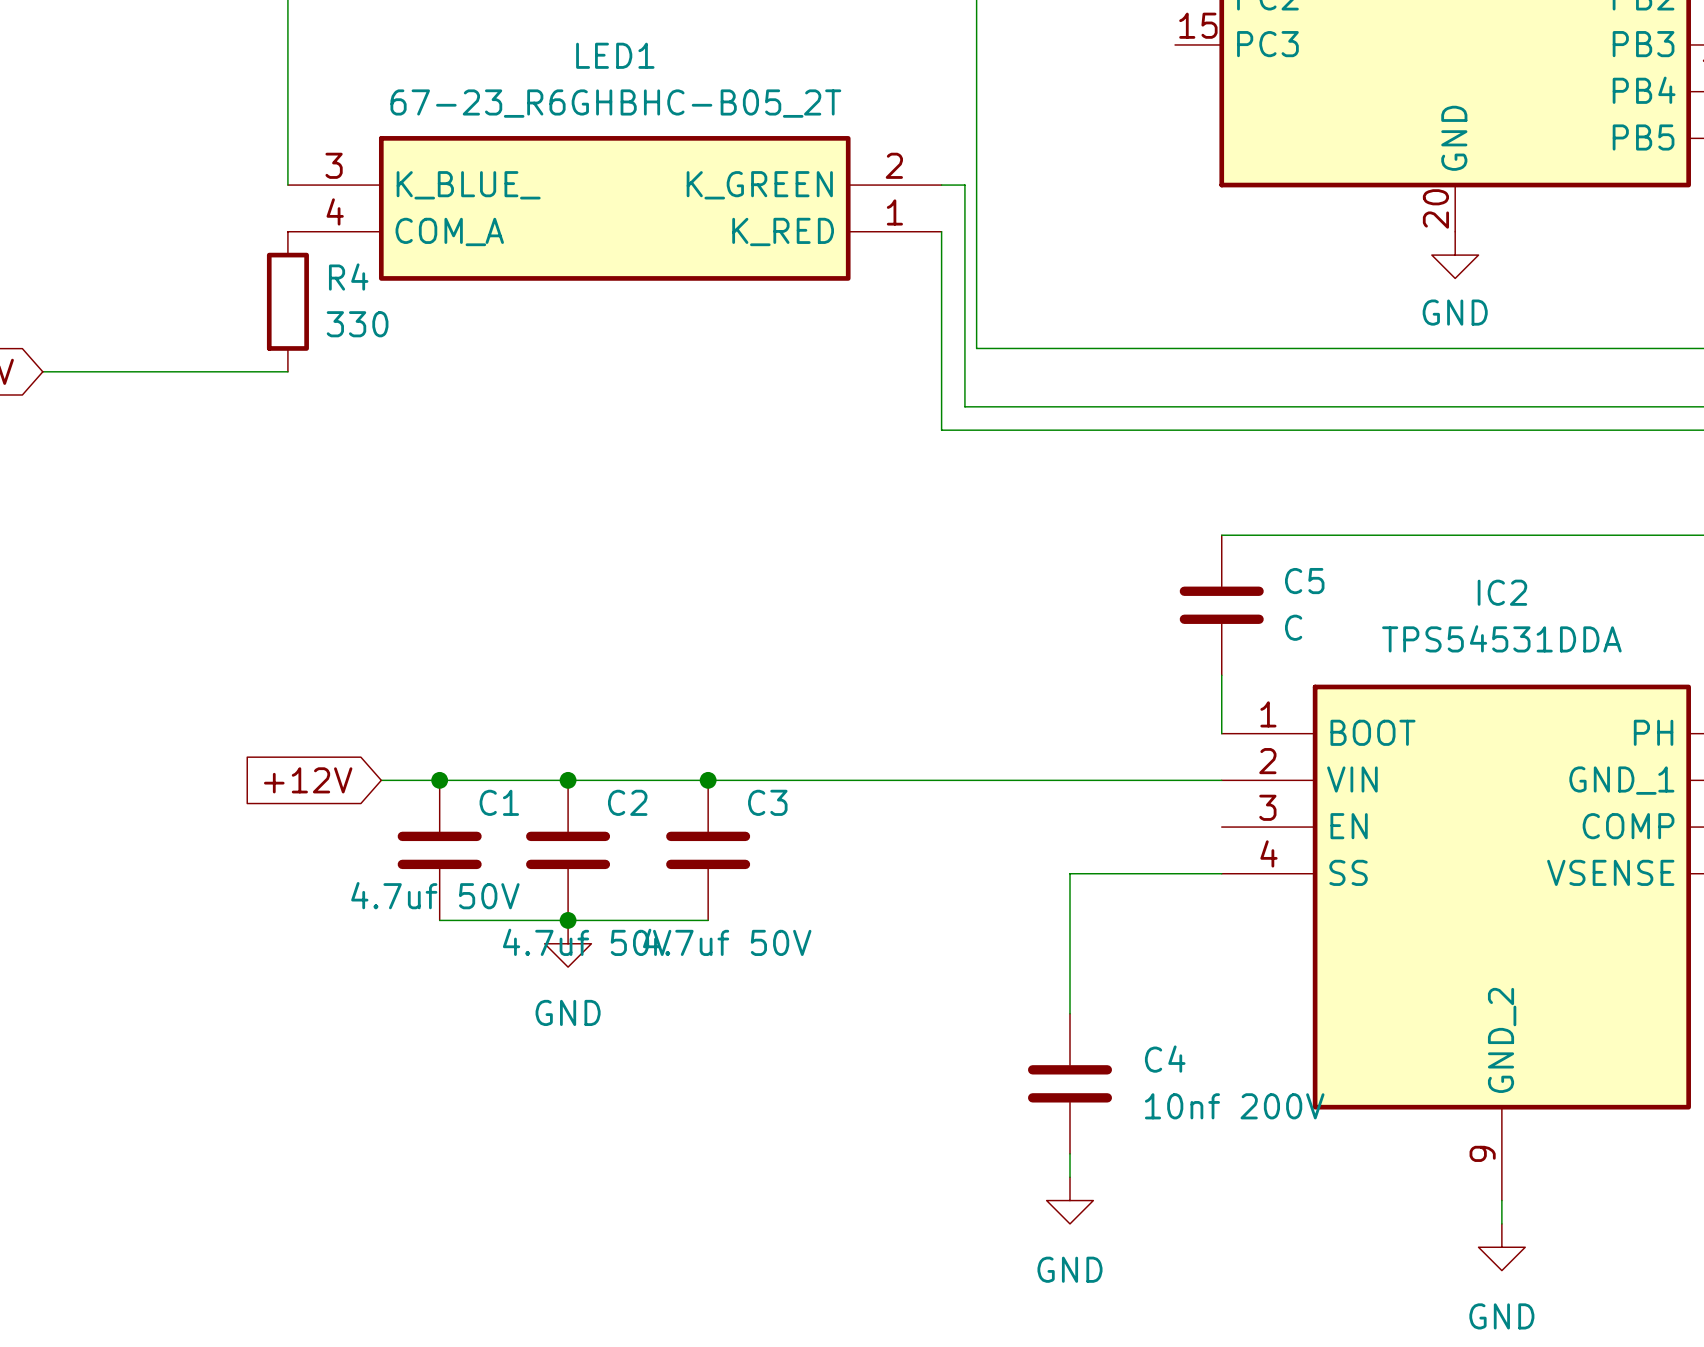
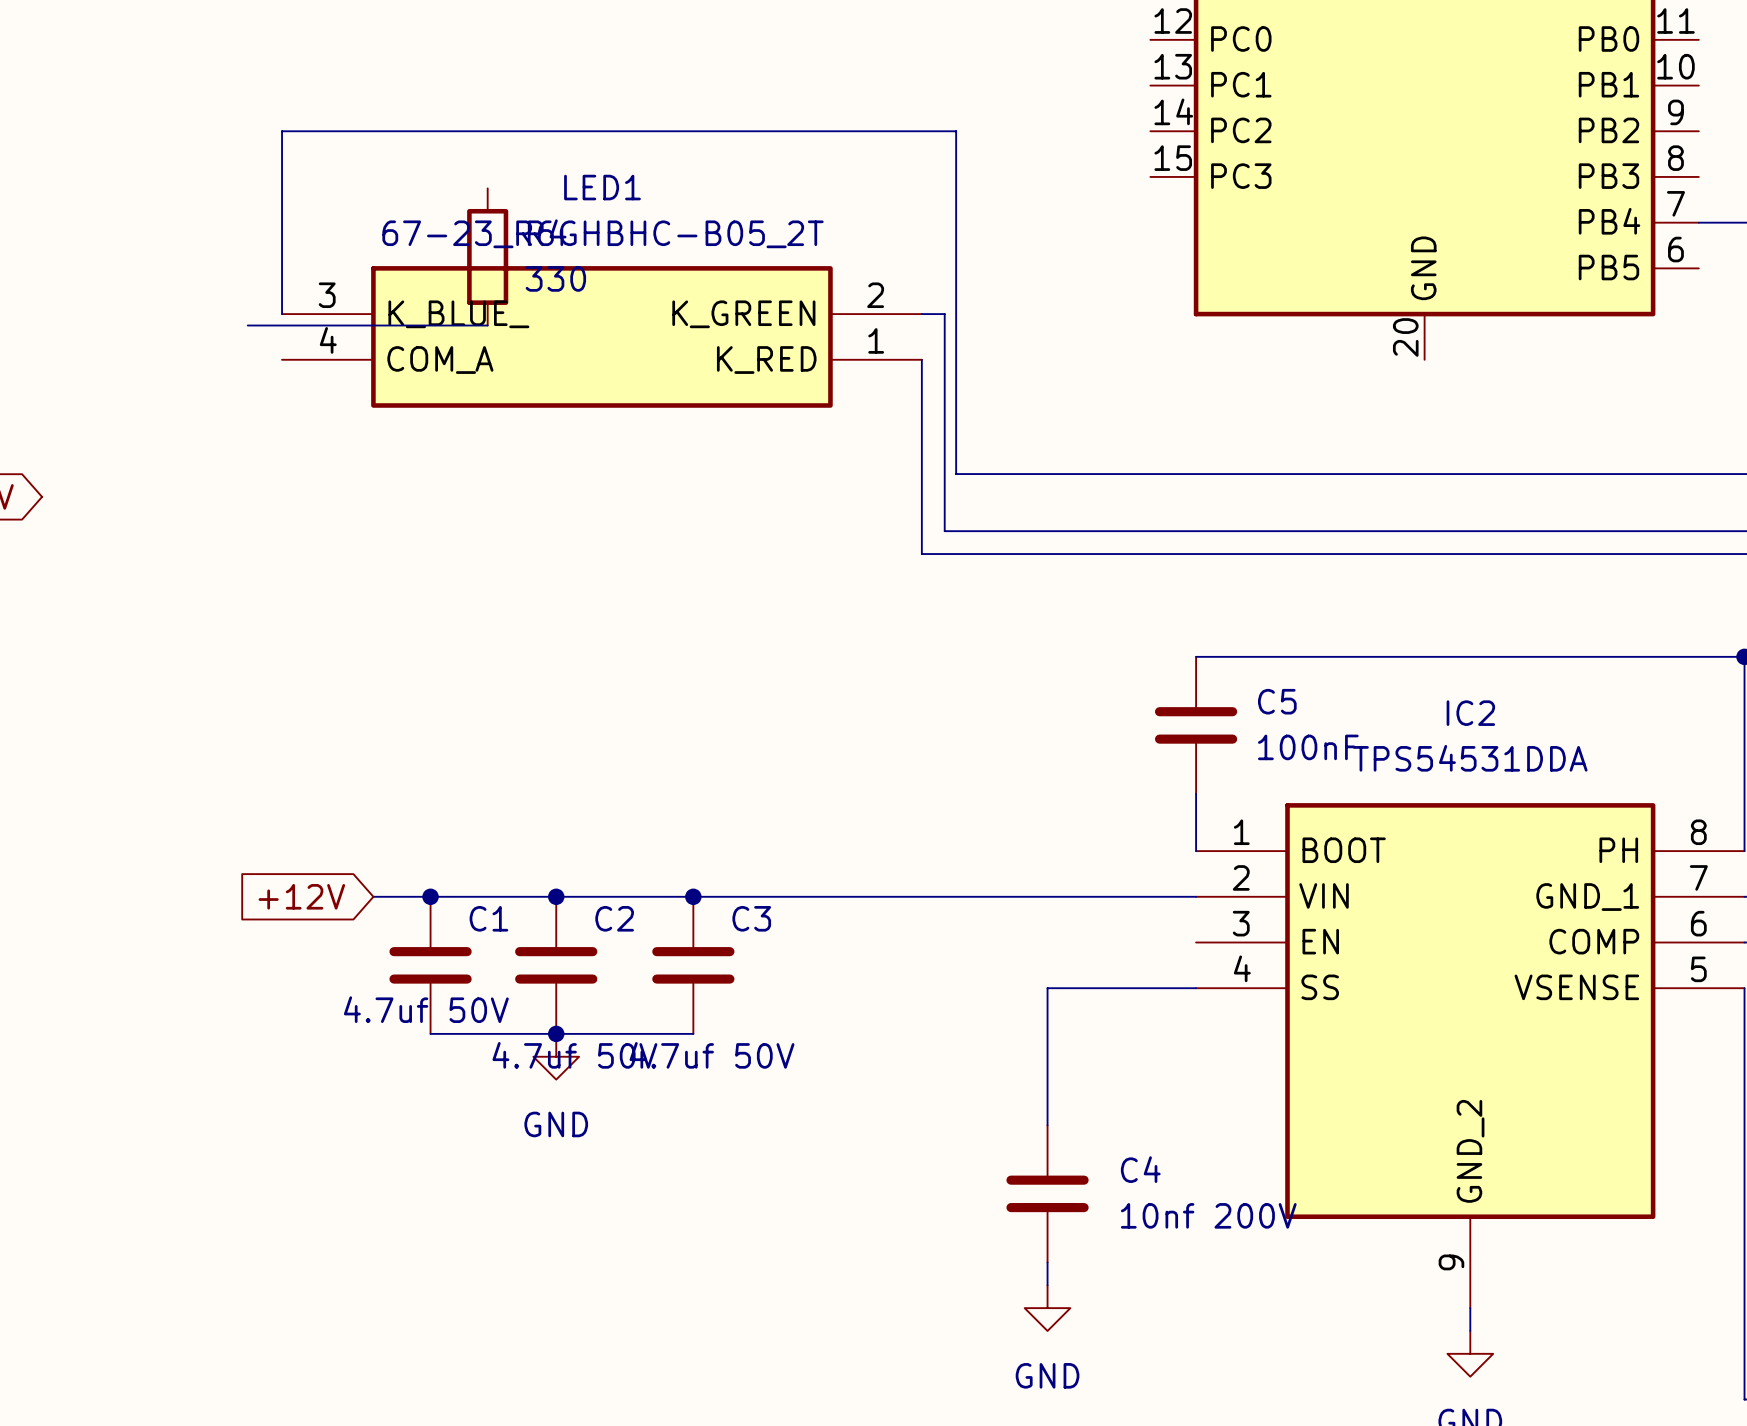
power symbol: GND (1455, 255) -> none
R4 position: (287, 301) -> (487, 256)
wire: (42, 371) (287, 371) -> (247, 325) (487, 325)
C5 value: C (1293, 627) -> 100nF (1308, 747)

